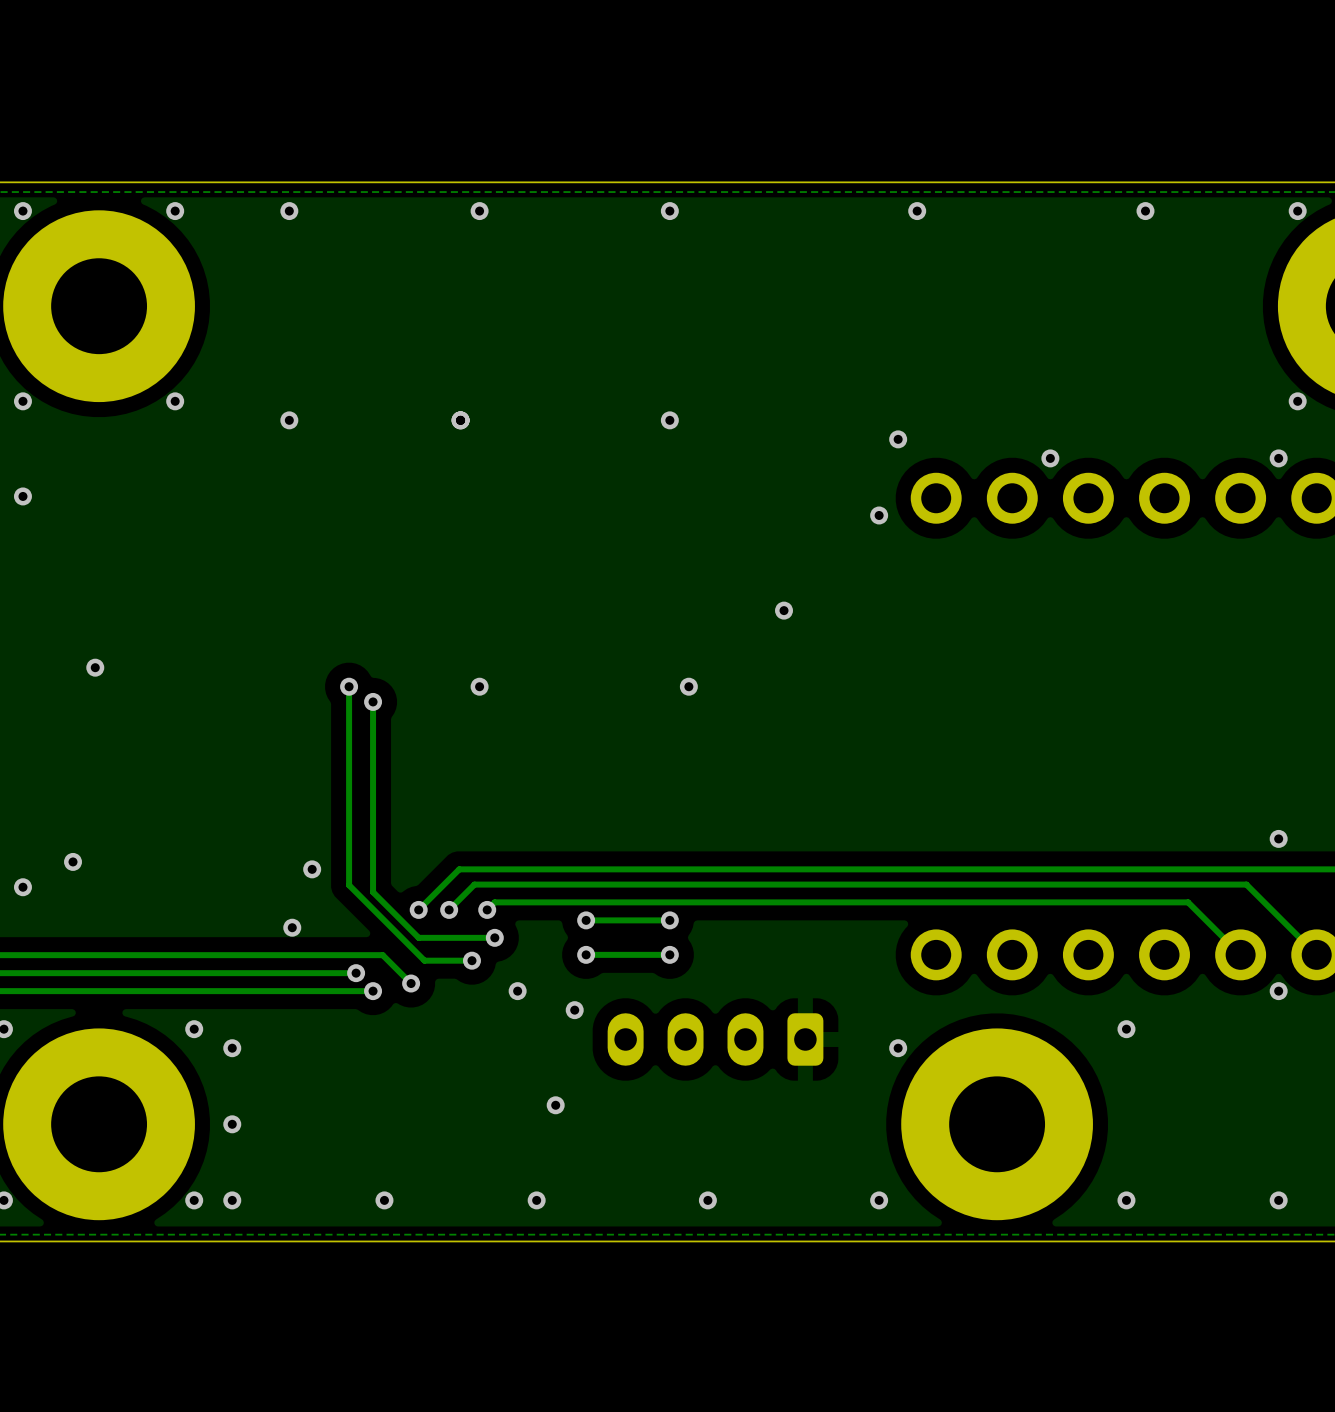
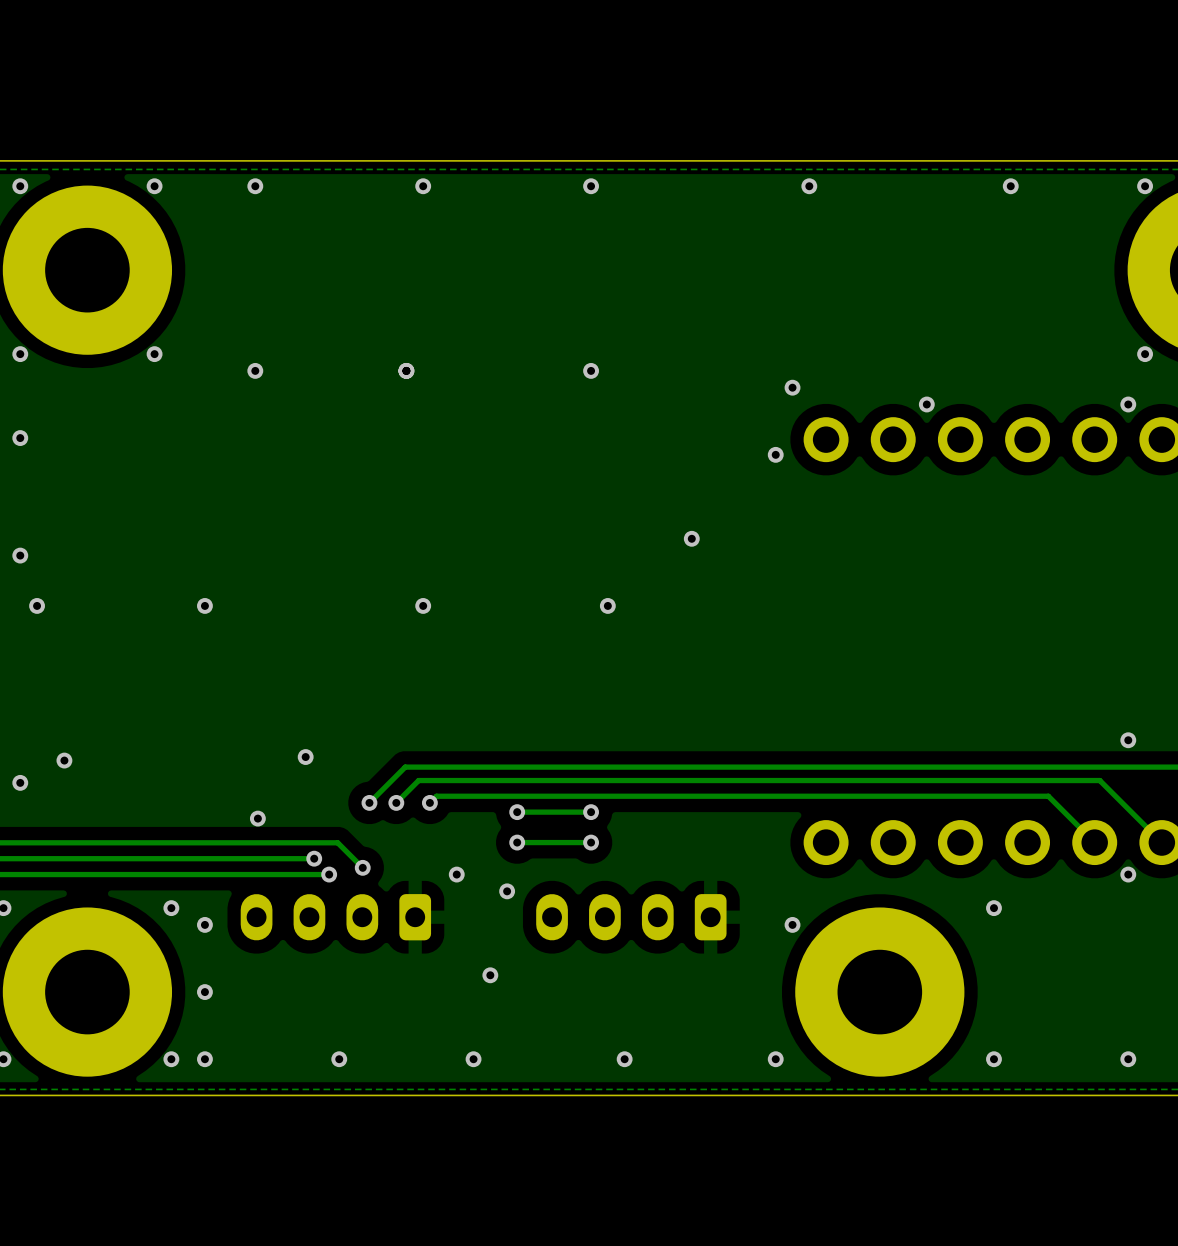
via: none -> (20, 555)
via: (95, 667) -> none
via: none -> (37, 605)
via: none -> (204, 605)
track: (349, 686) (349, 885) (424, 960) (471, 960) -> none
via: (349, 686) -> none
track: (373, 701) (373, 892) (418, 937) (494, 937) -> none
via: (373, 701) -> none
via position: (312, 869) -> (305, 757)
via: (494, 937) -> none
via: (471, 960) -> none
part: none -> (335, 917)

